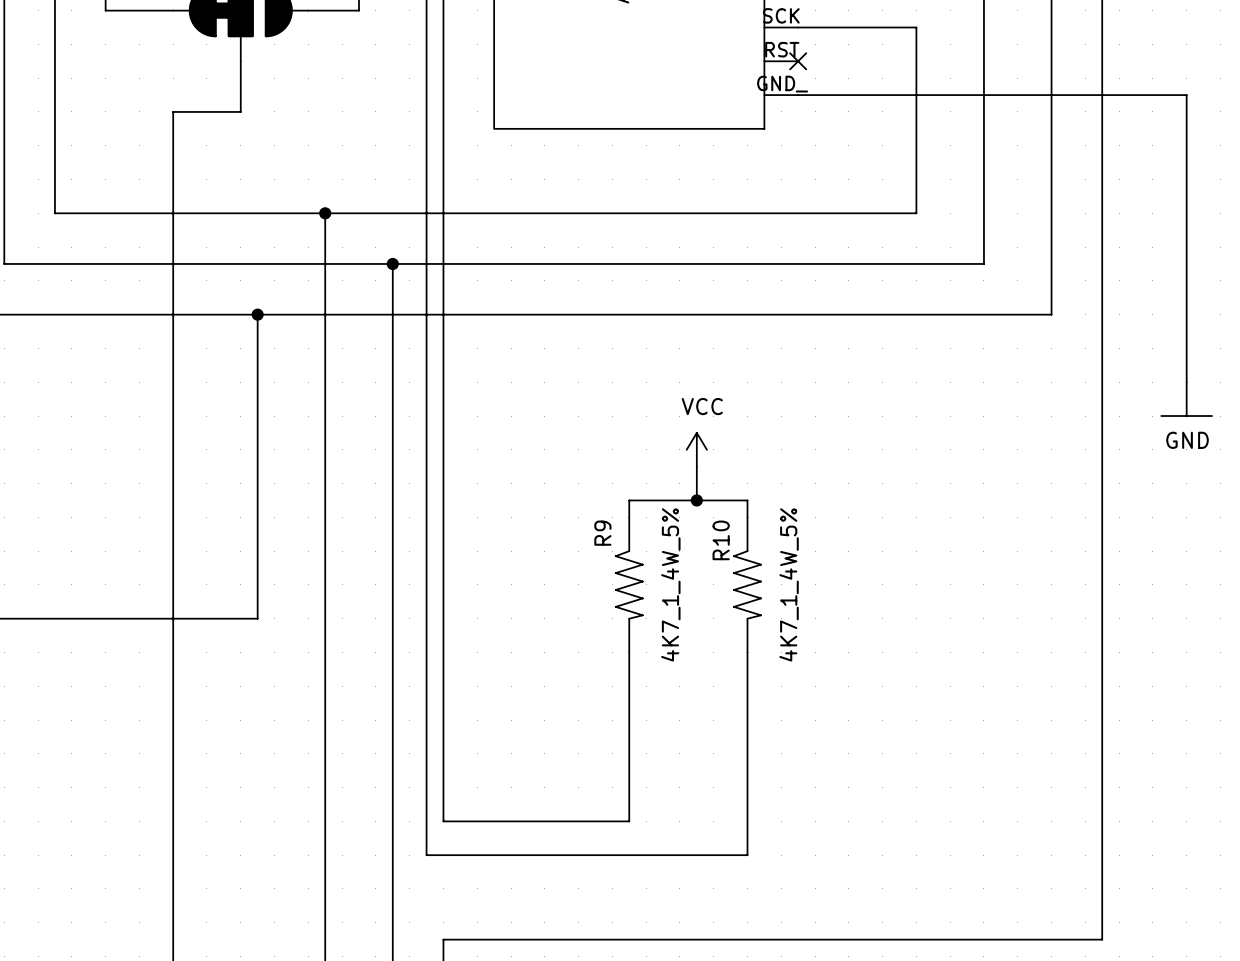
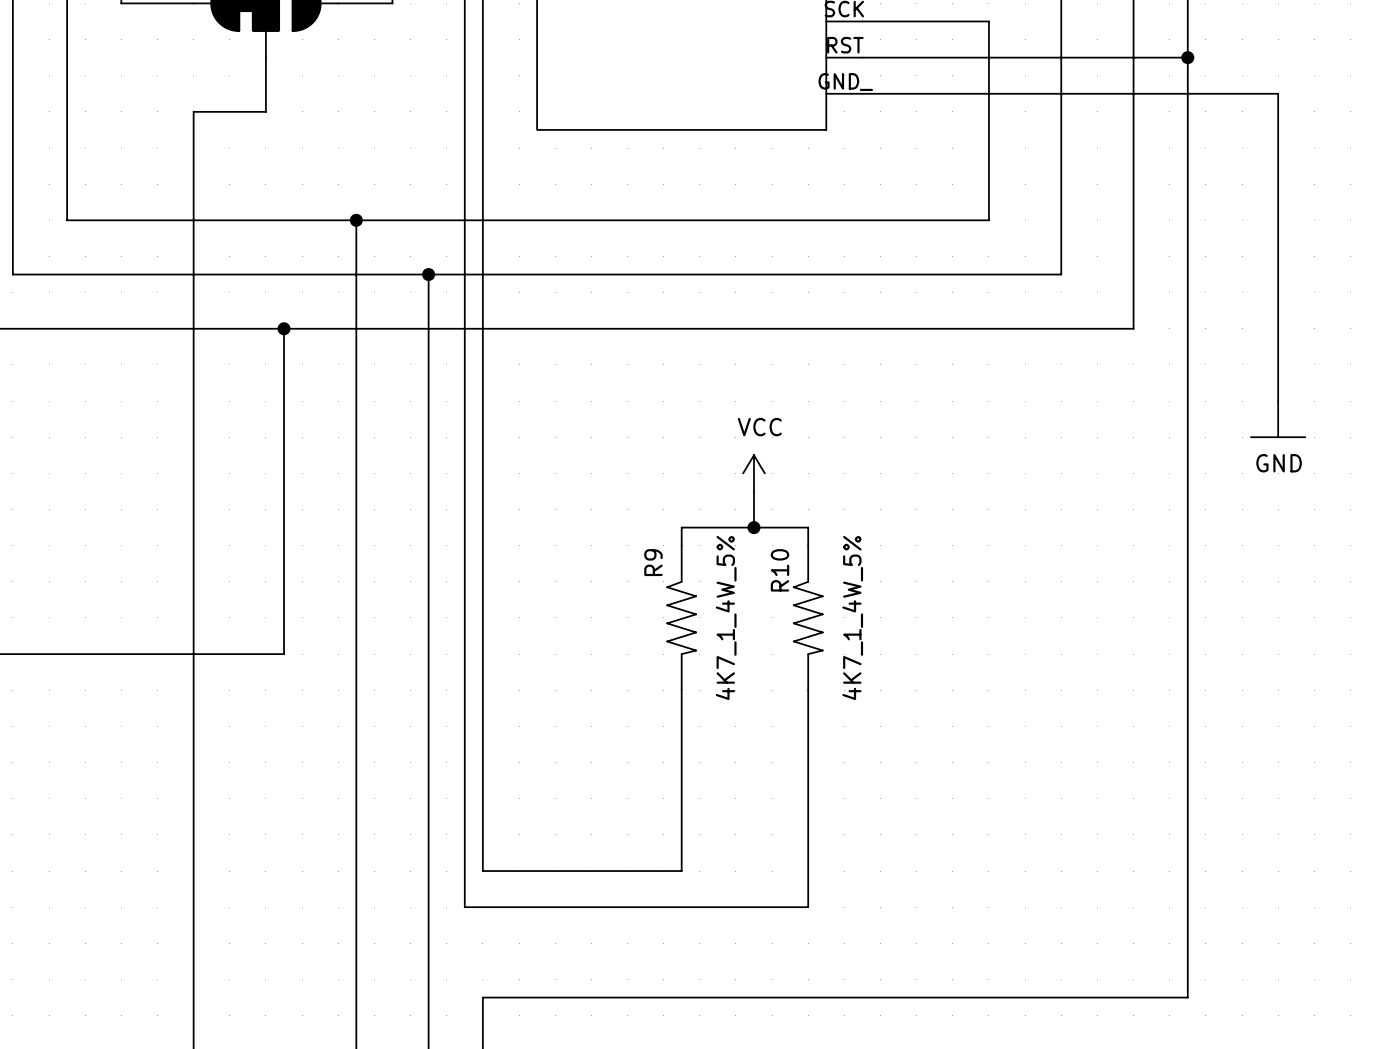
wire: none -> (862, 57) (1187, 57)
no-connect mark: (798, 61) -> none
junction: none -> (1187, 57)

